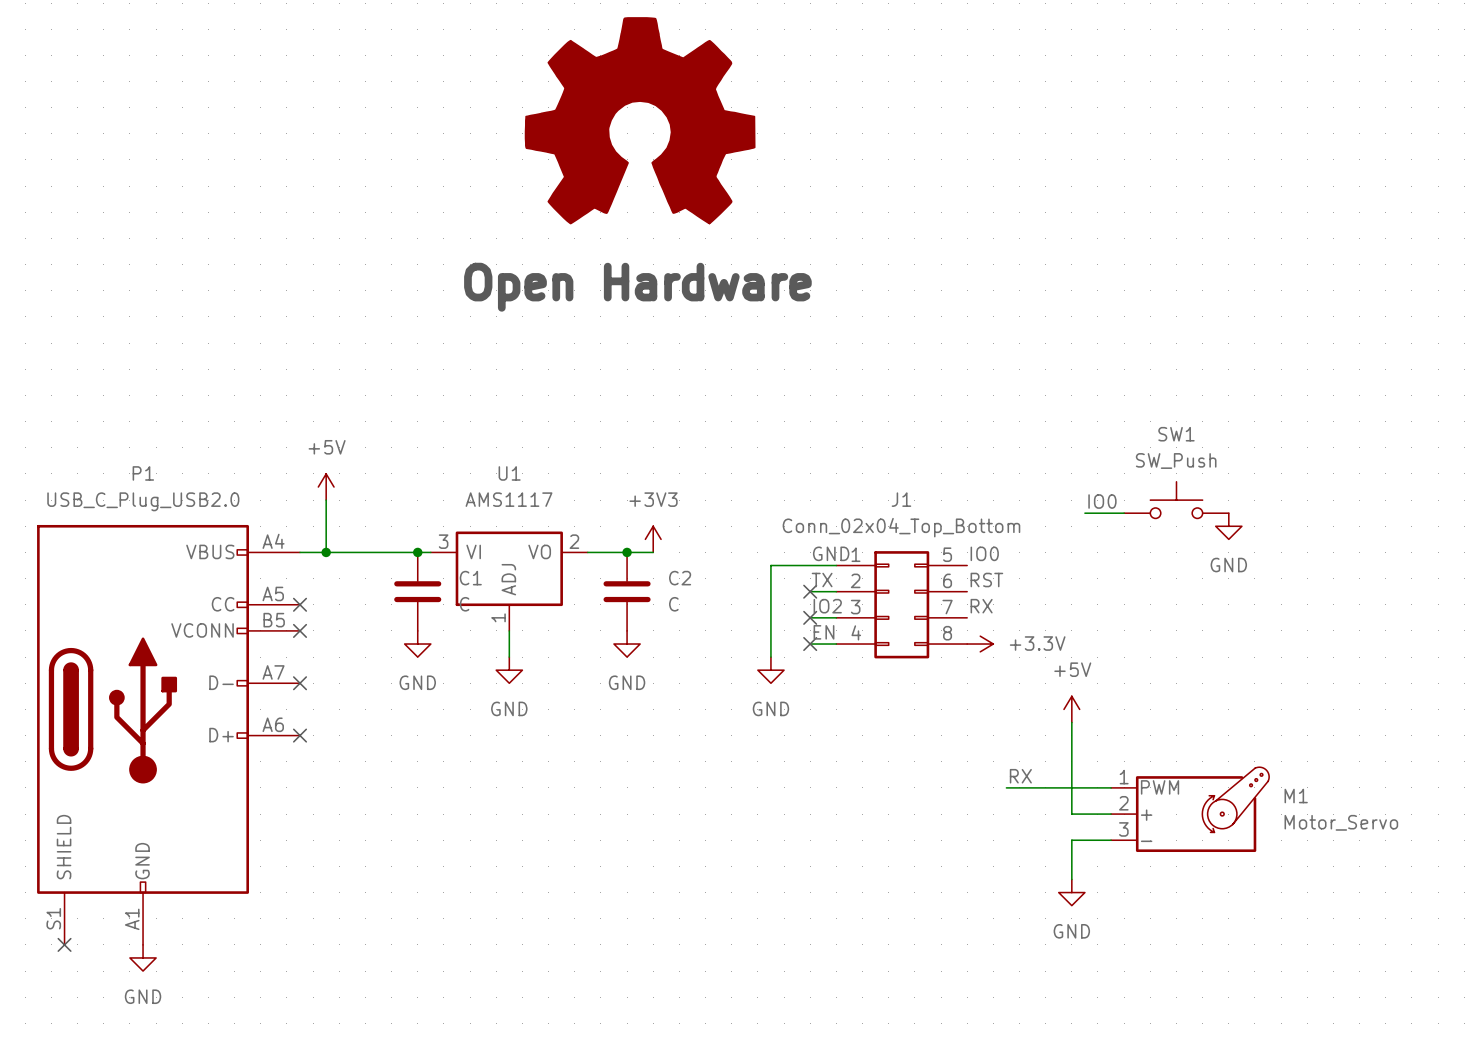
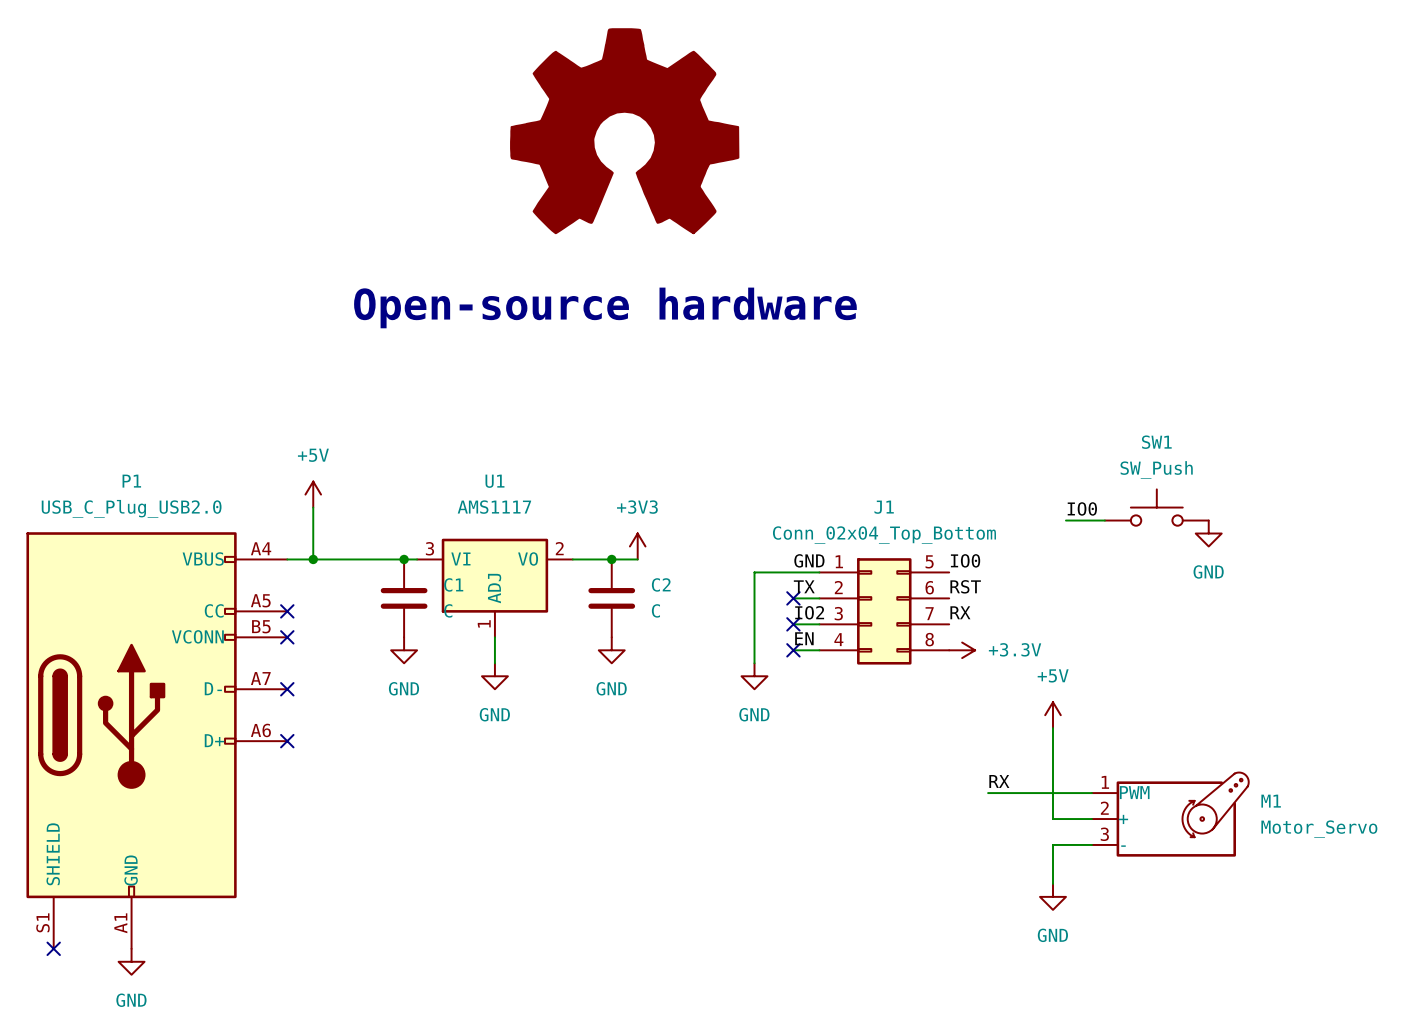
text: Open Hardware (637, 287) -> Open-source hardware (605, 307)

